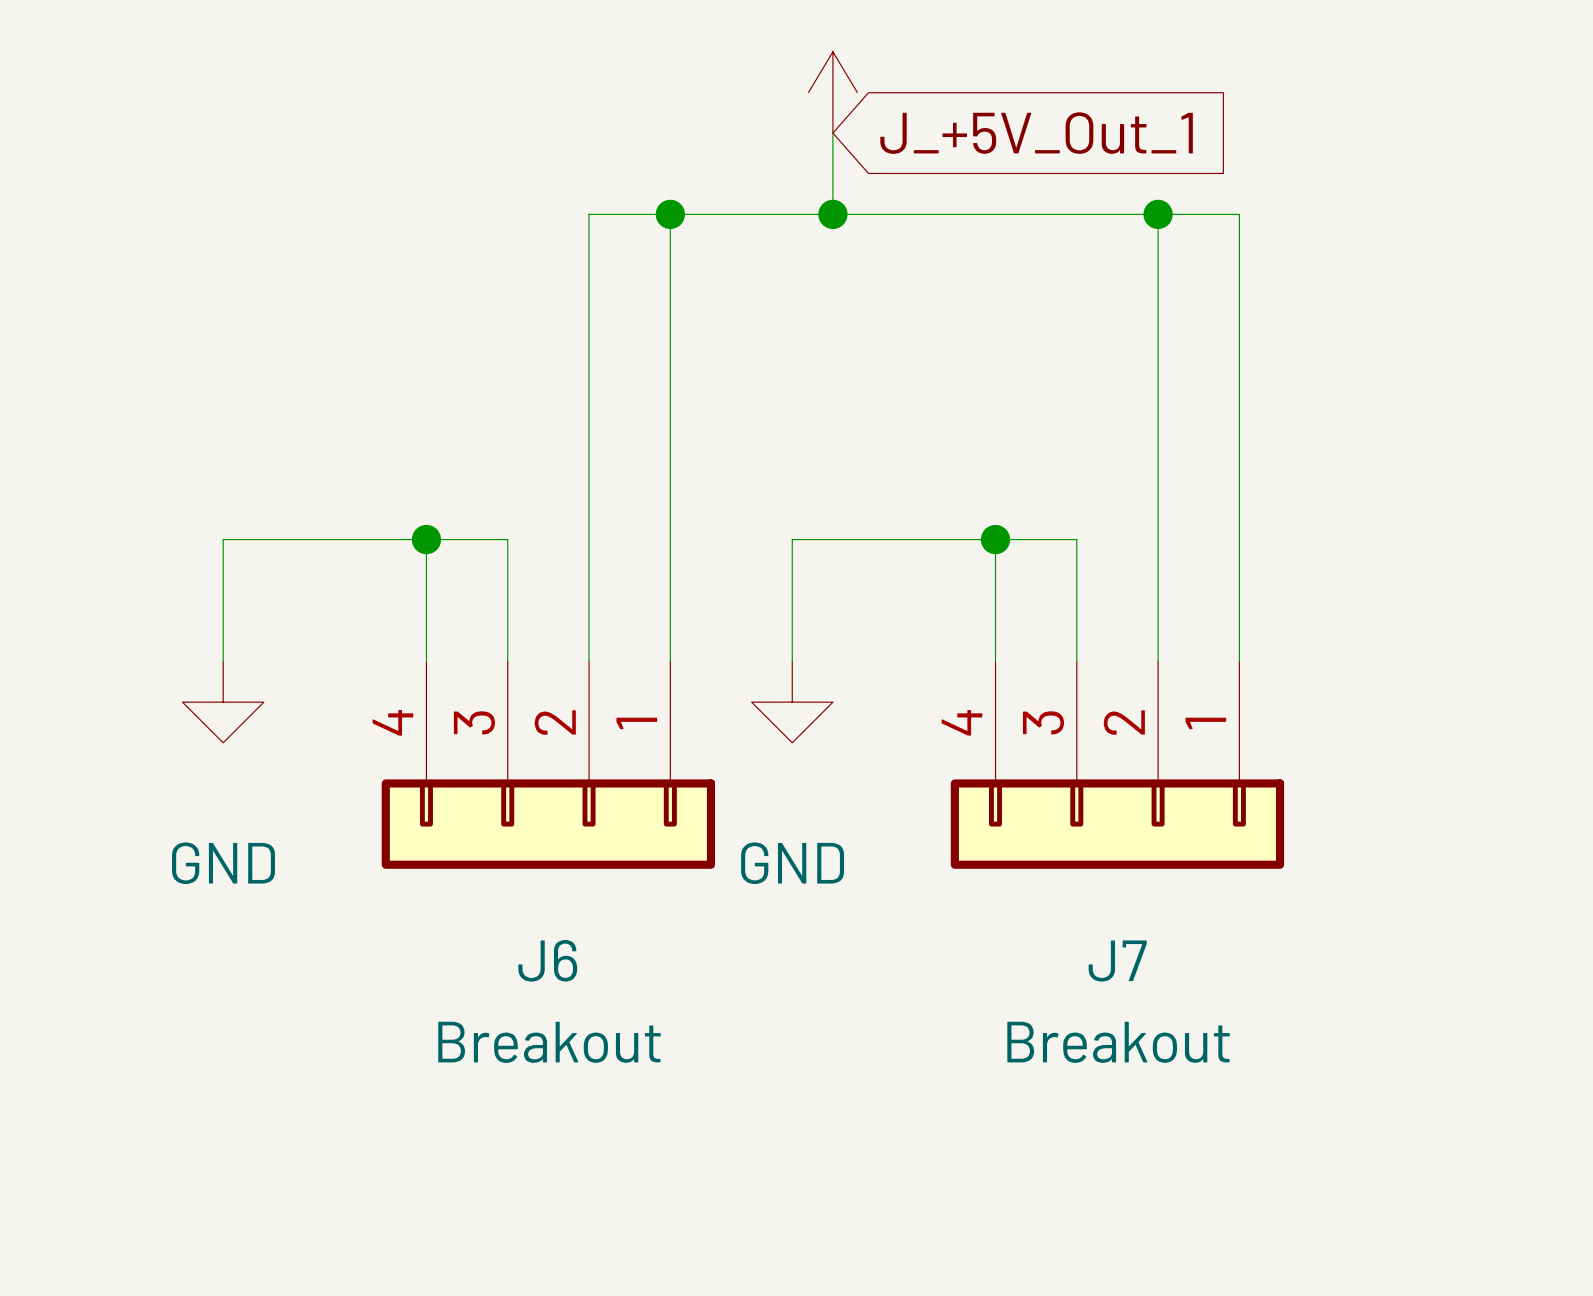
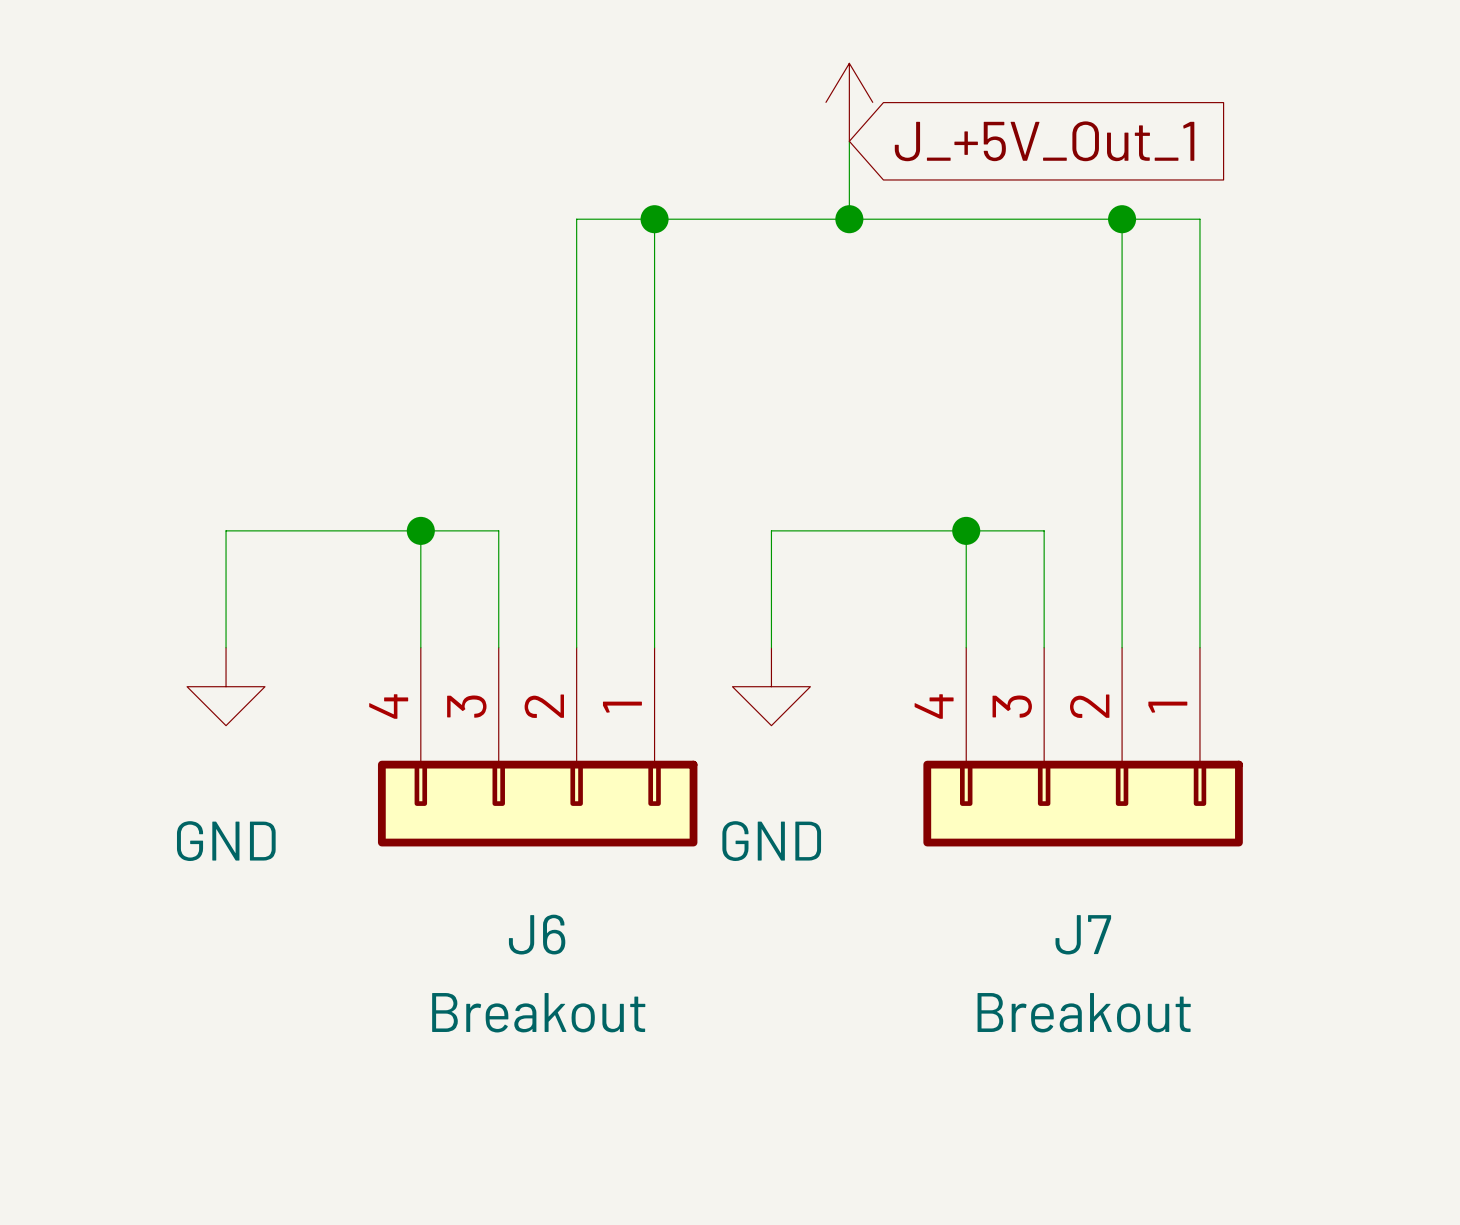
power symbol position: (832, 92) -> (849, 102)
wire: (832, 133) (832, 214) -> (849, 141) (849, 219)
global label position: J_+5V_Out_1 (1036, 133) -> J_+5V_Out_1 (1044, 141)
junction position: (832, 214) -> (849, 219)

